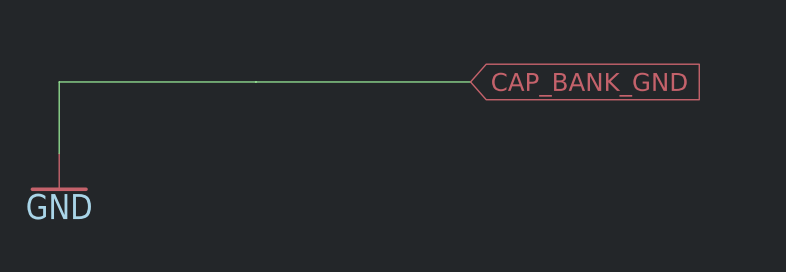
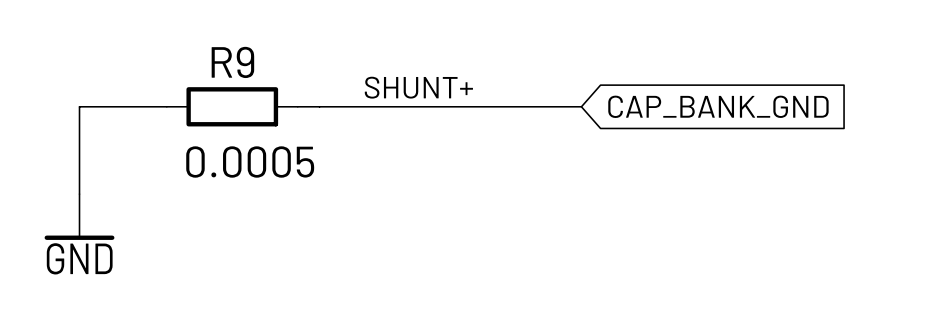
label: none -> SHUNT+ (418, 87)
wire: (130, 81) (238, 81) -> none
R9: none -> 0.0005 (232, 106)

